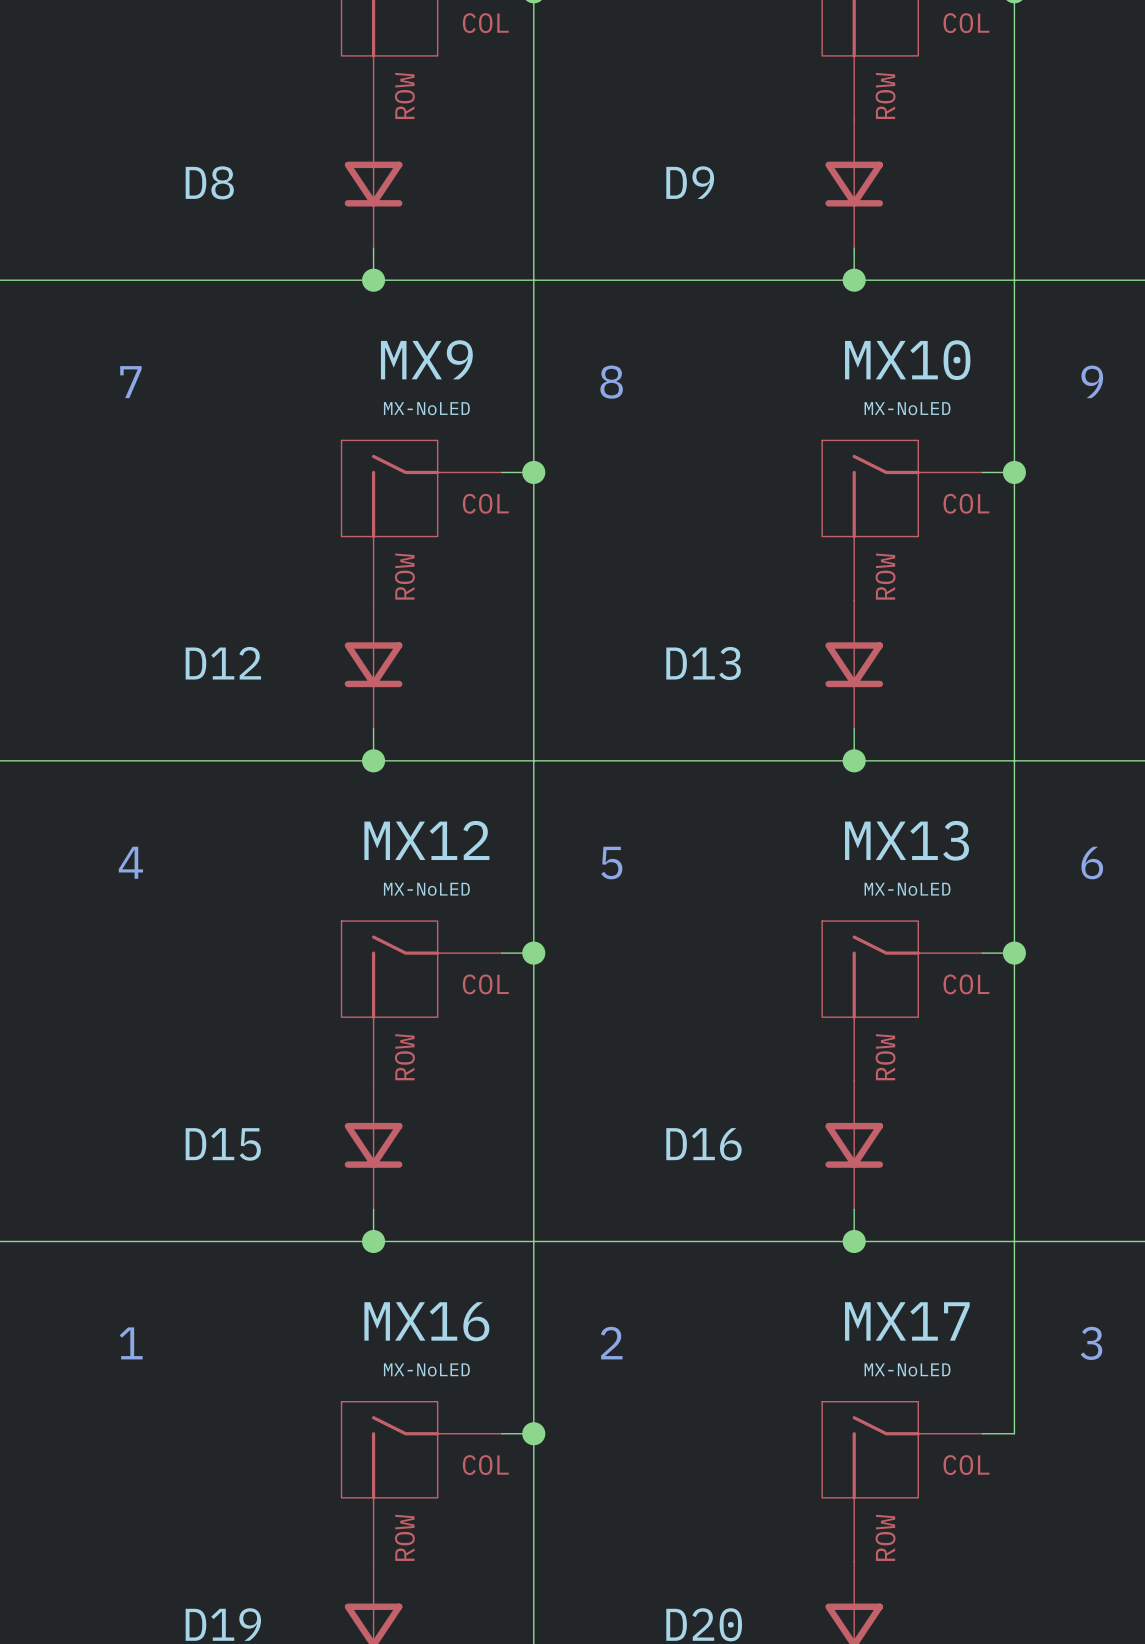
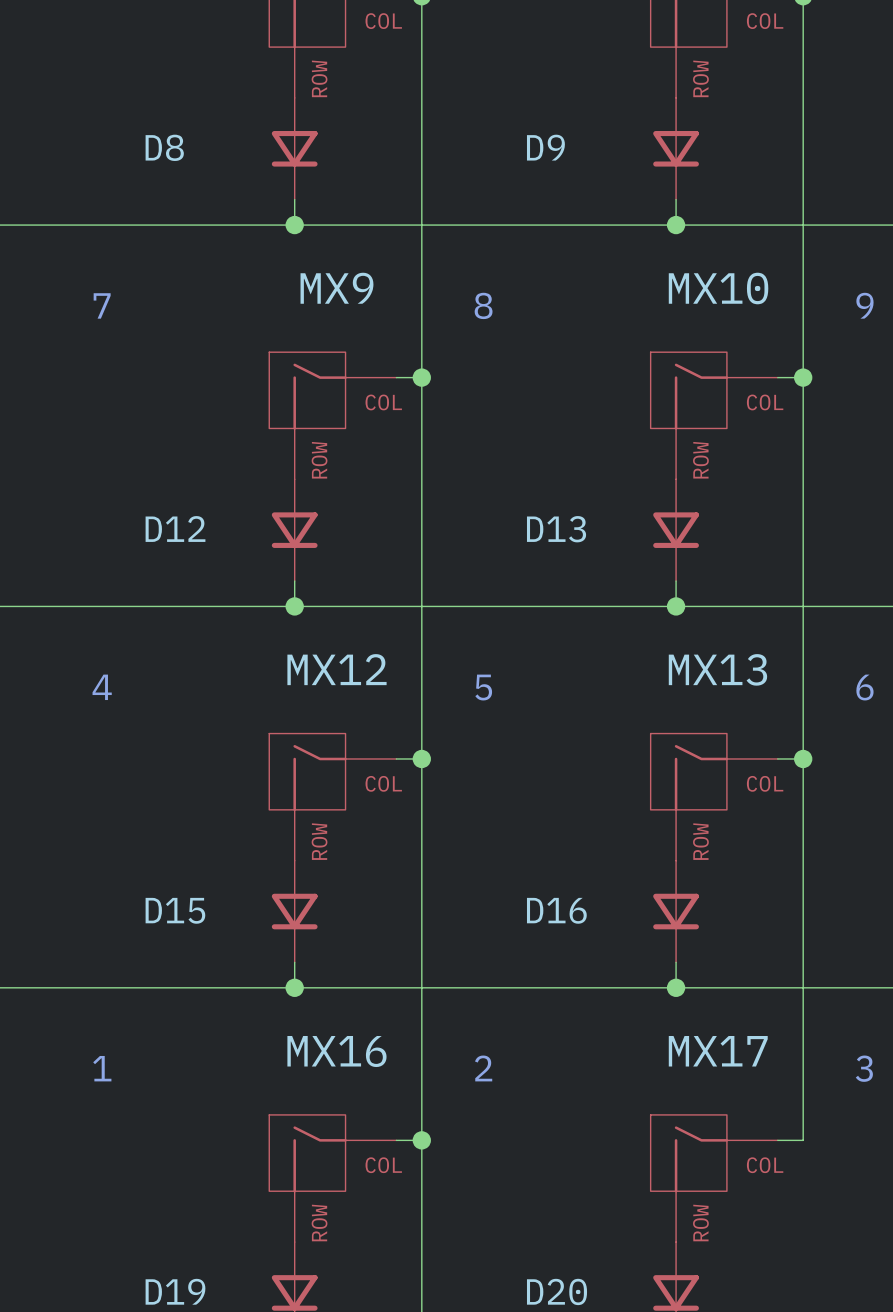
MX9 value: MX-NoLED (426, 408) -> none
MX10 value: MX-NoLED (907, 408) -> none
MX12 value: MX-NoLED (426, 889) -> none
MX13 value: MX-NoLED (907, 889) -> none
MX16 value: MX-NoLED (426, 1369) -> none
MX17 value: MX-NoLED (907, 1369) -> none

